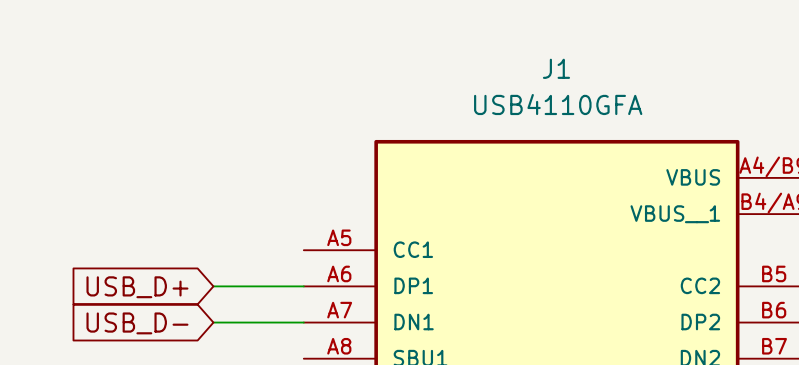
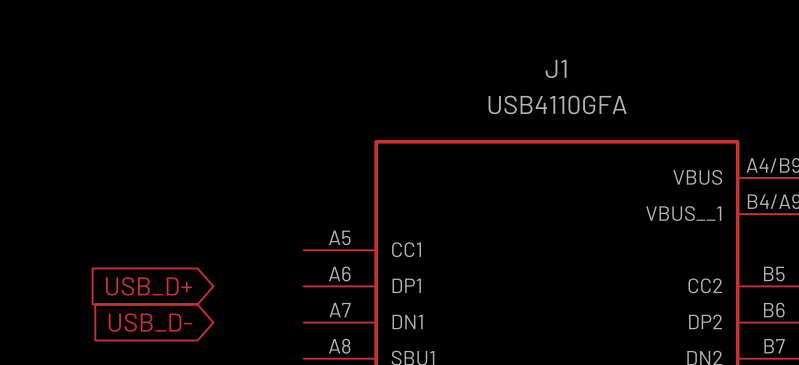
wire: (213, 286) (303, 286) -> none
wire: (213, 322) (303, 322) -> none

